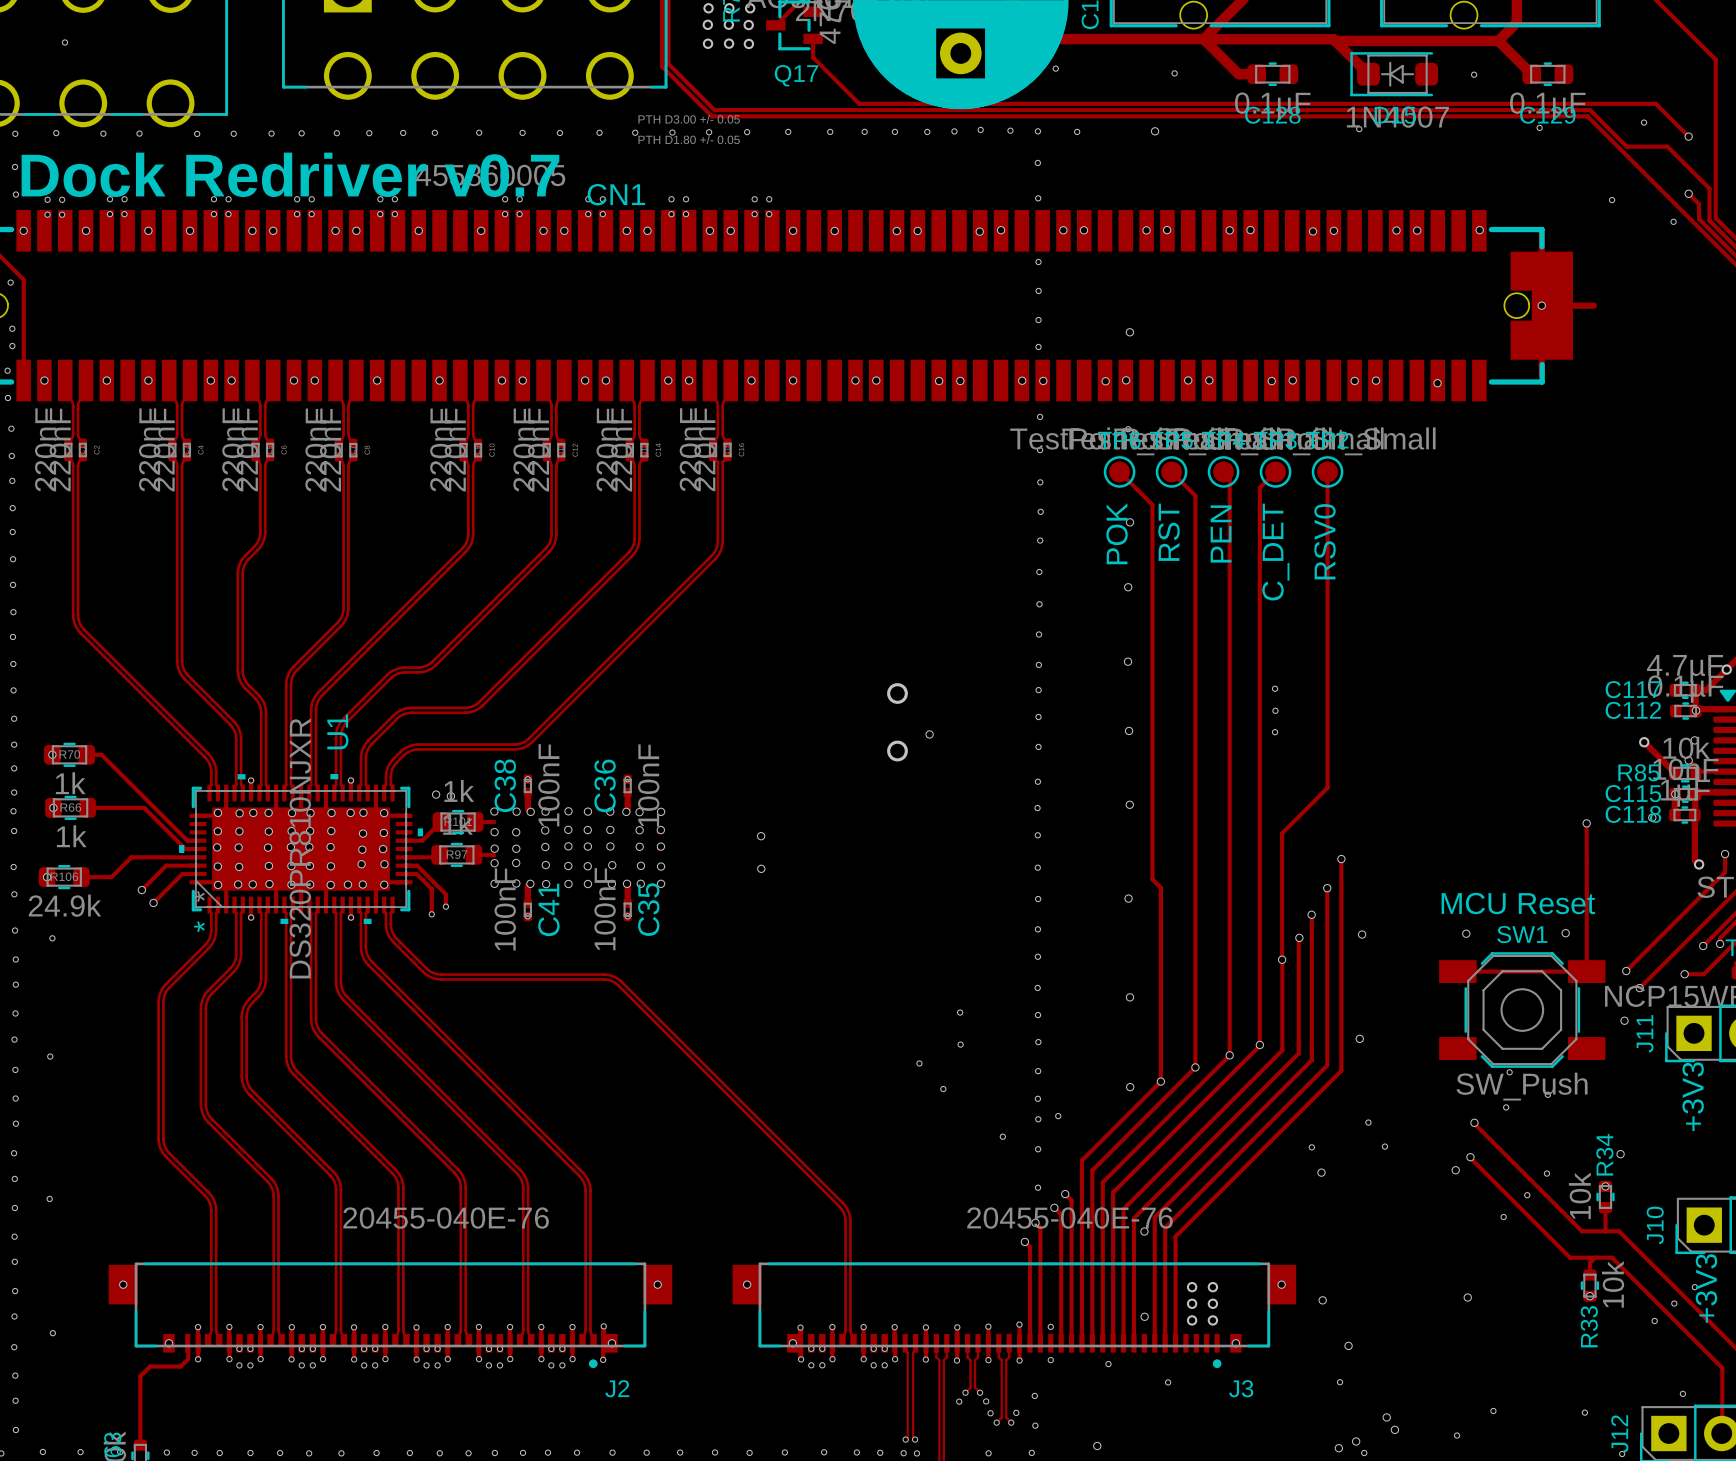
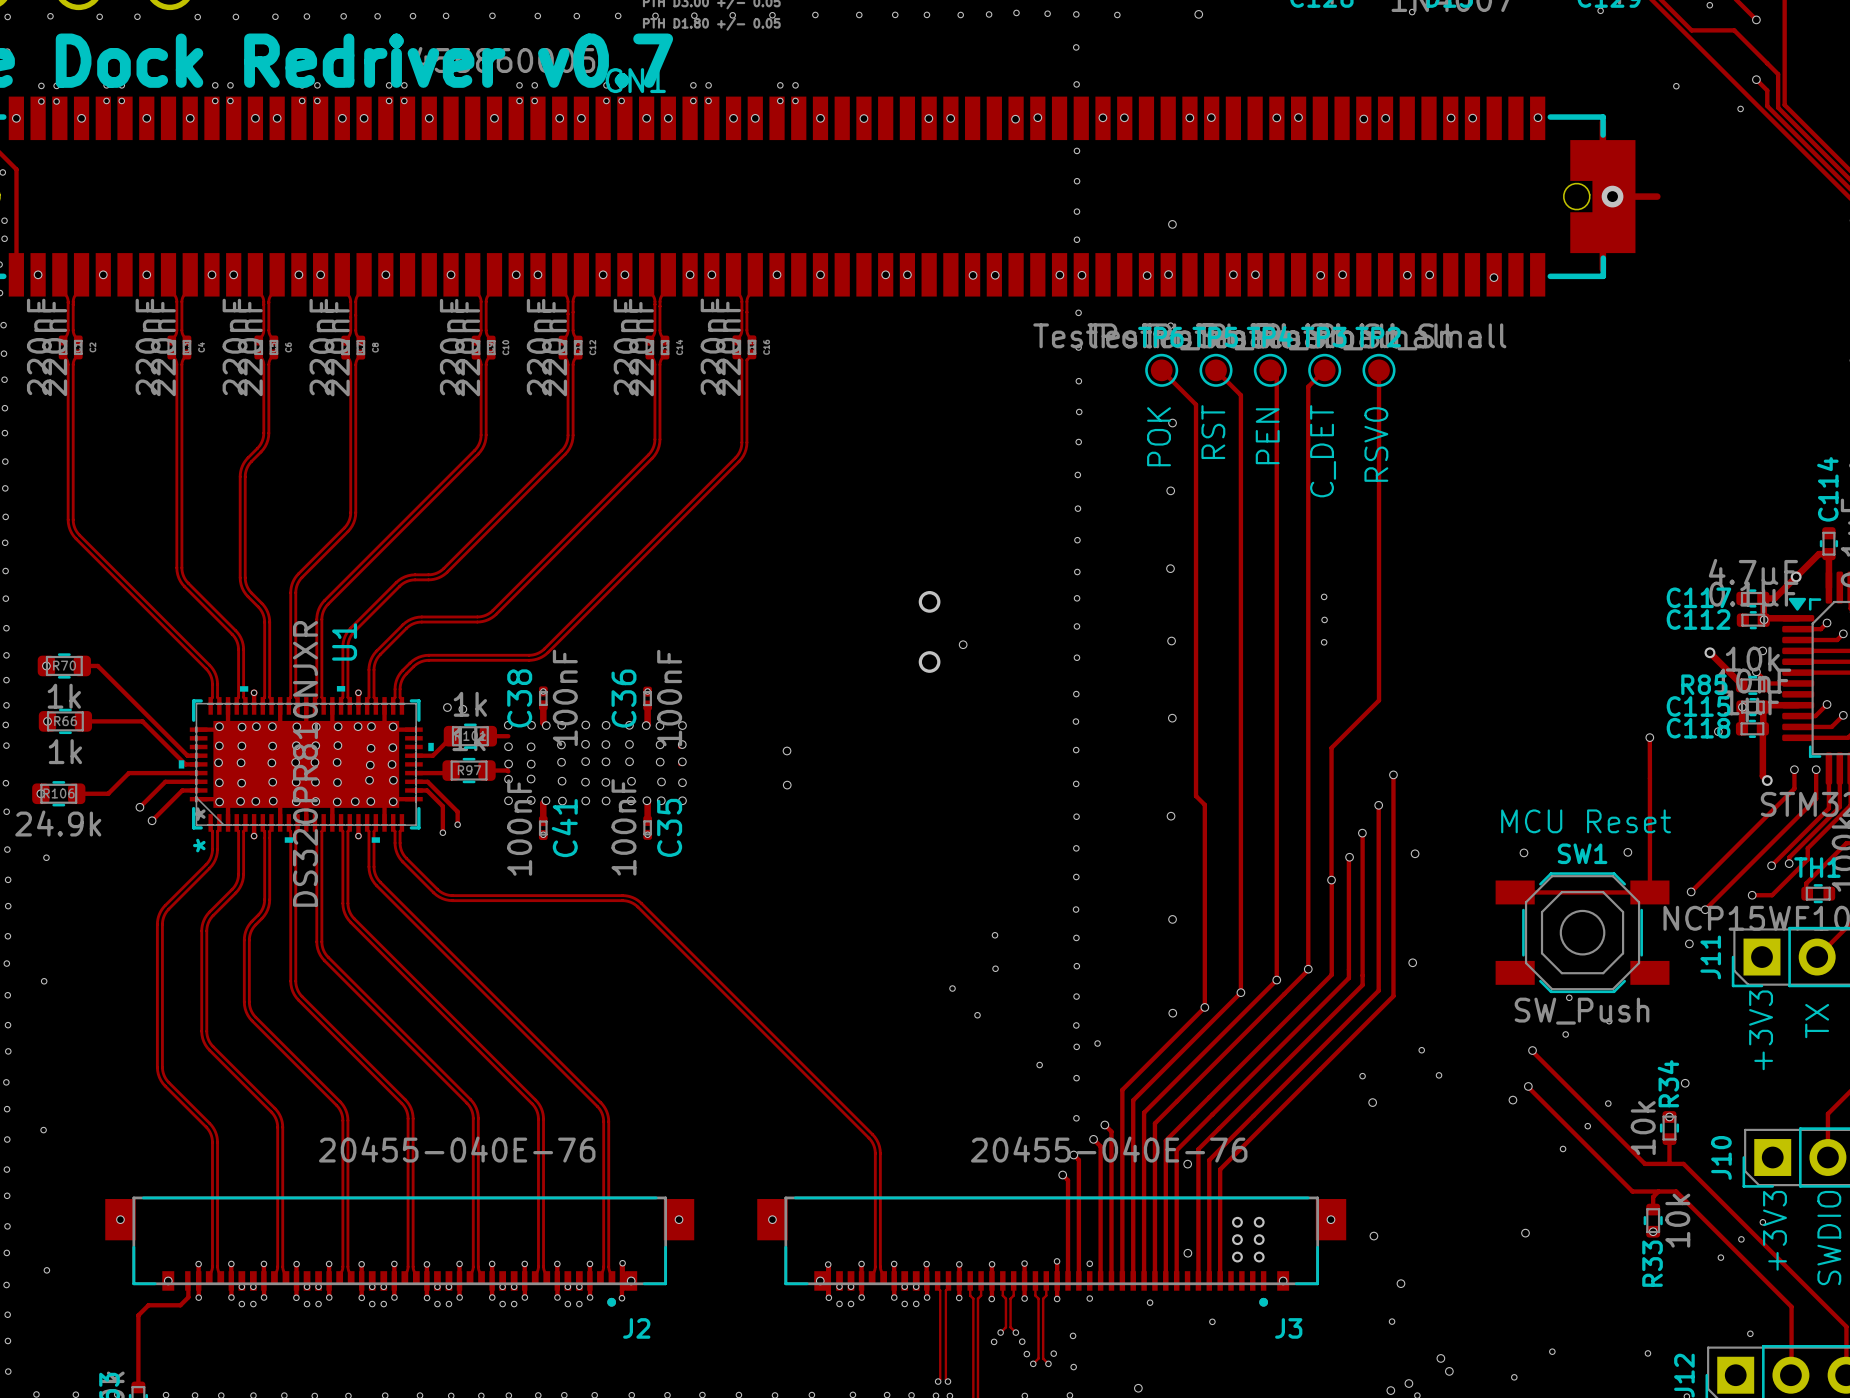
via size: [1537, 301, 1546, 310] -> [1601, 185, 1624, 208]

